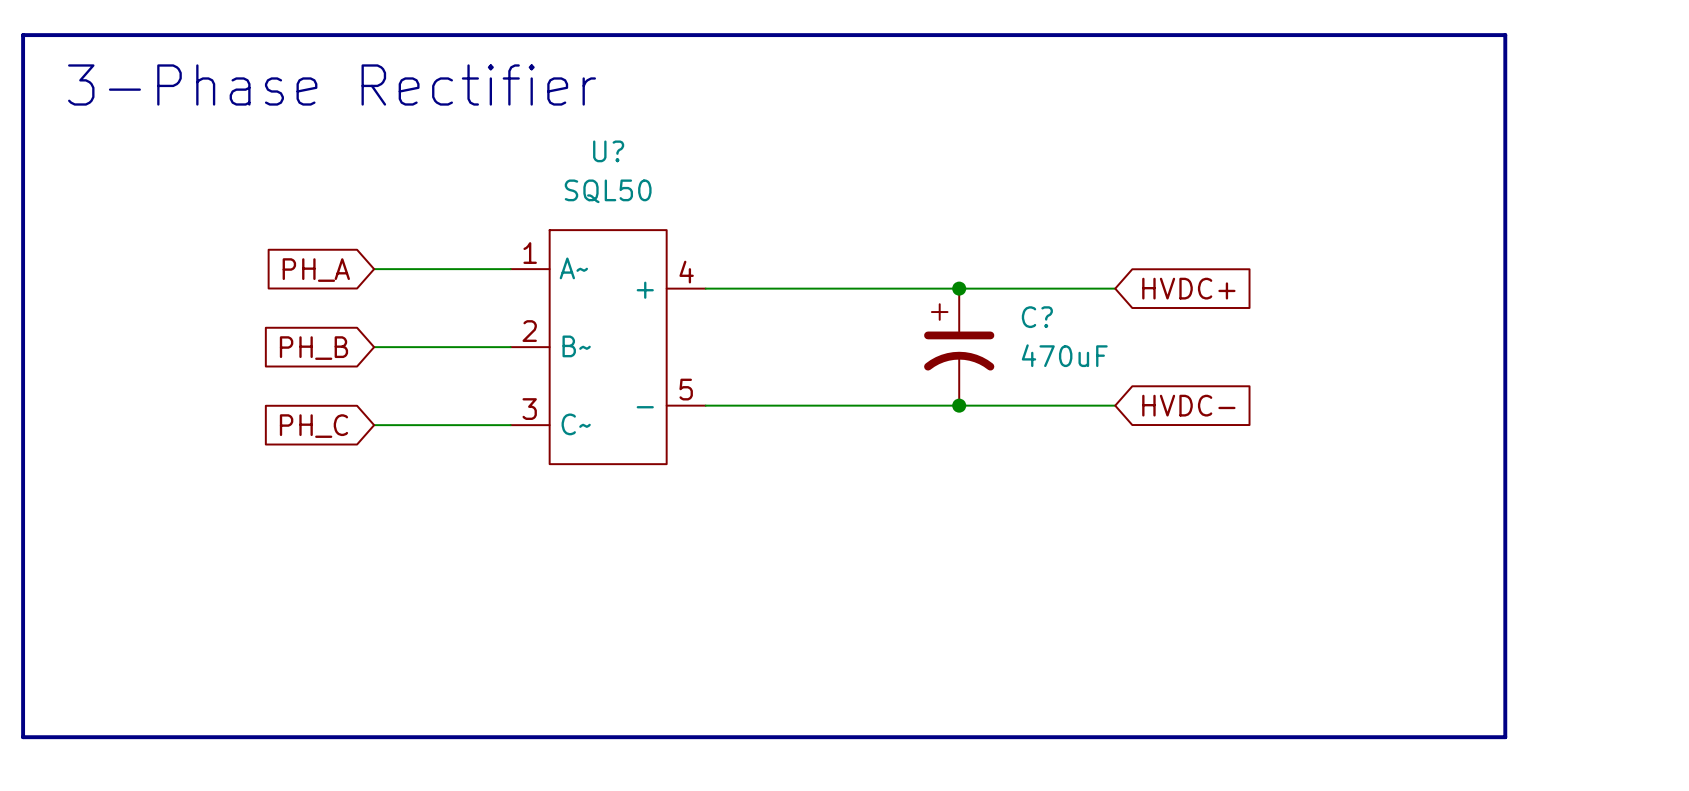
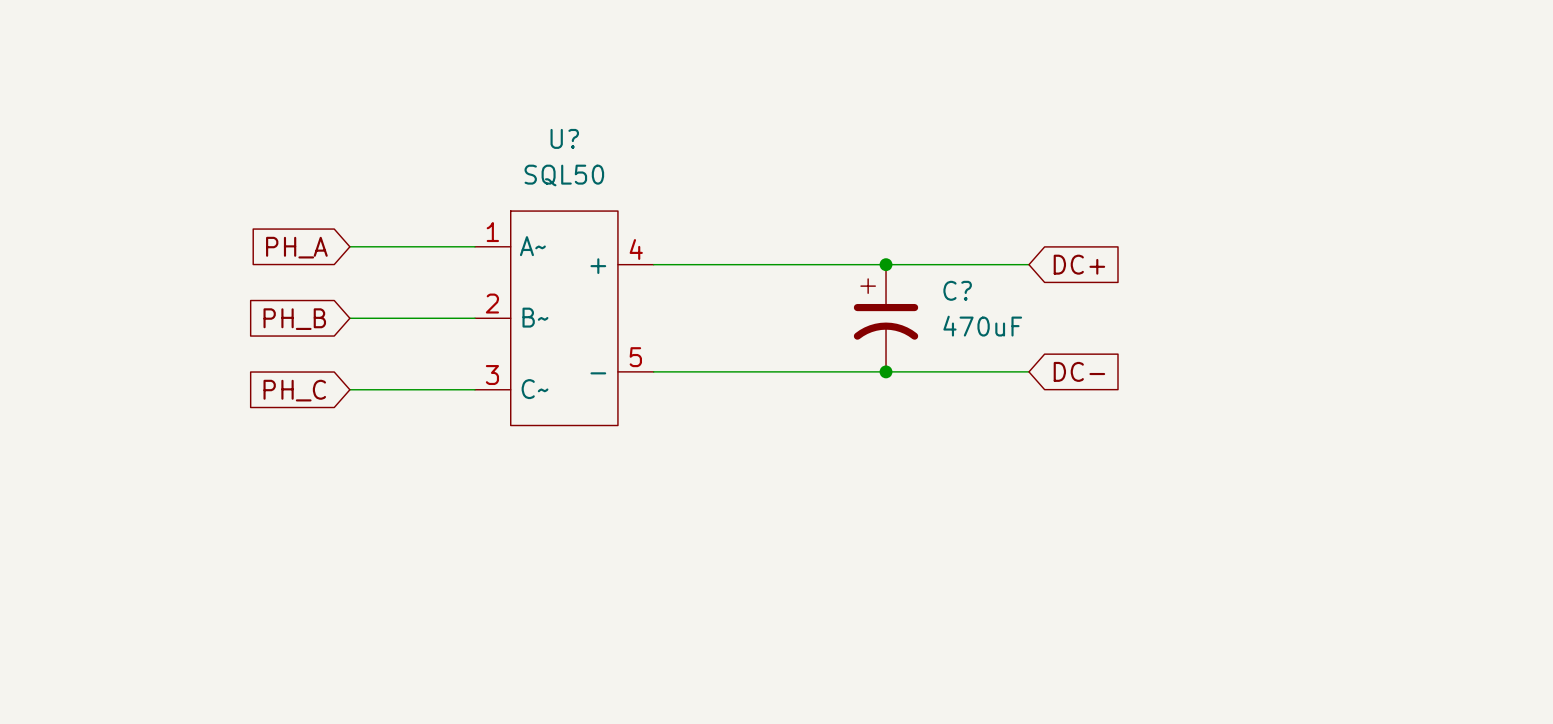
line: (23, 35) (1505, 35) (1505, 737) (23, 737) (23, 35) -> none
text: 3-Phase Rectifier (332, 84) -> none
global label: HVDC+ (1188, 288) -> DC+ (1079, 264)
global label: HVDC- (1188, 405) -> DC- (1079, 371)

